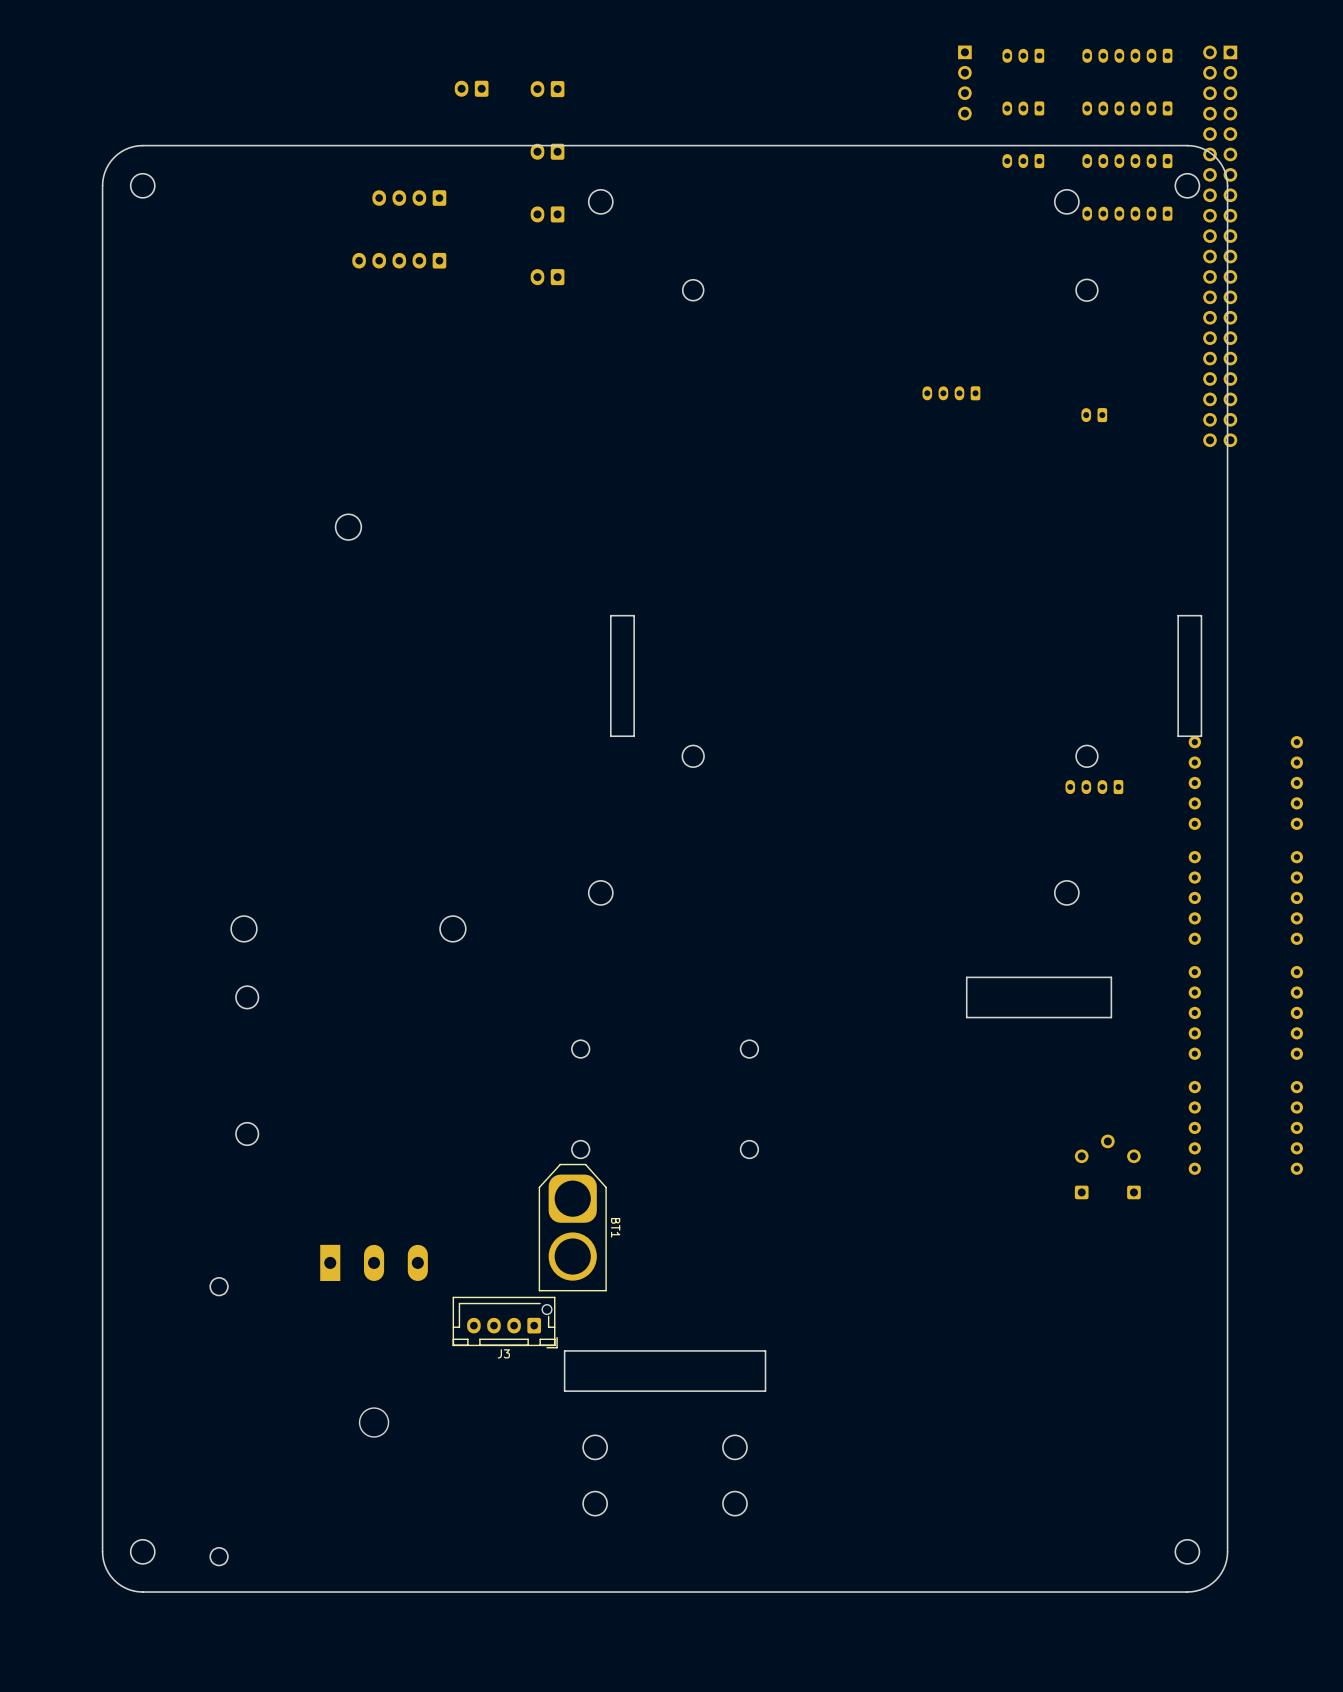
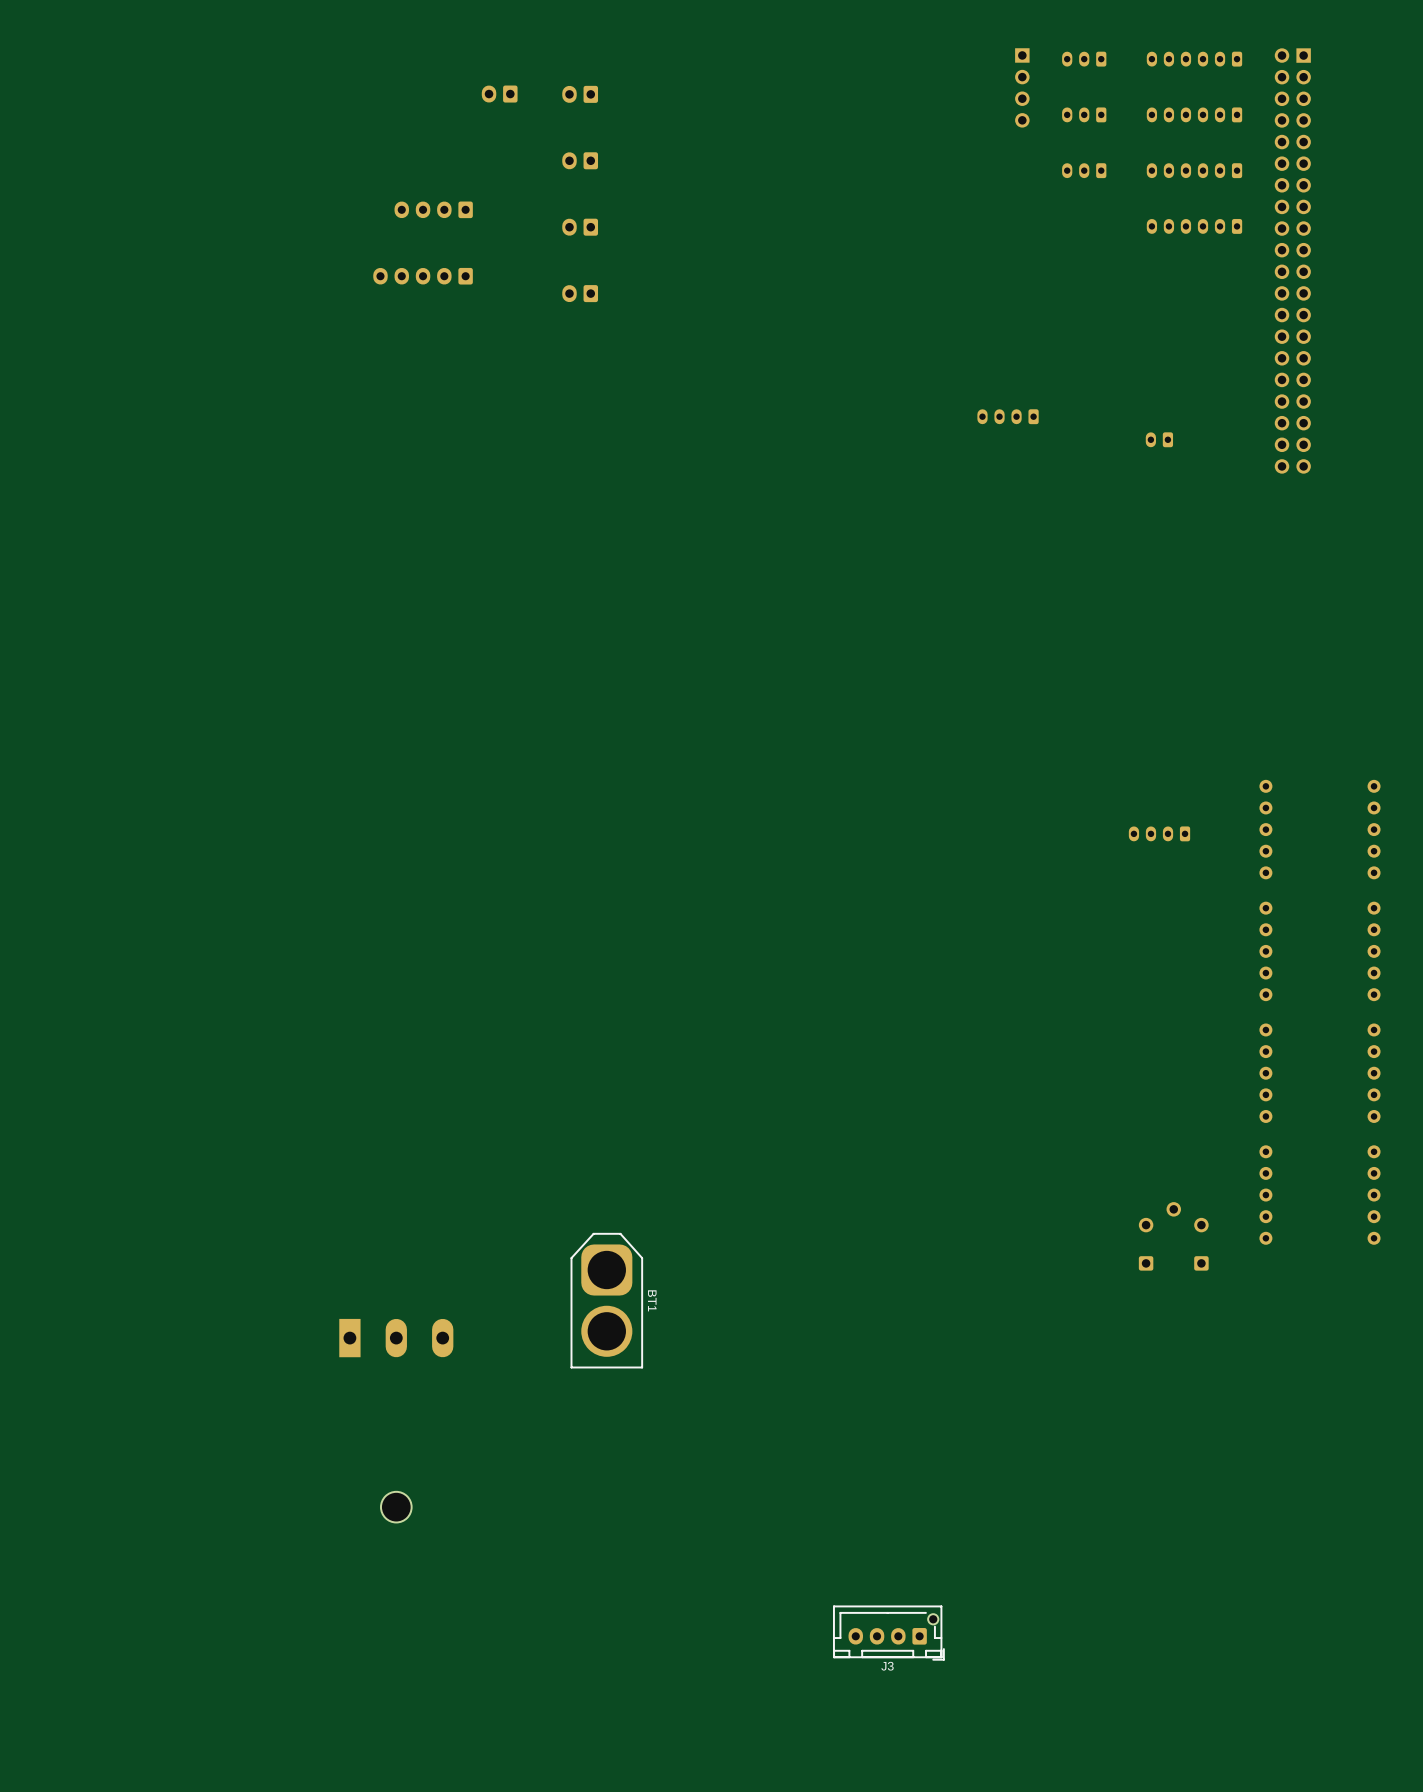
board edge: (1187, 145) (142, 145) (125, 149) (111, 160) (104, 172) (102, 185) (102, 1551) (106, 1569) (117, 1583) (129, 1589) (142, 1592) (1187, 1592) (1204, 1588) (1218, 1576) (1225, 1565) (1227, 1551) (1227, 185) (1223, 168) (1215, 157) (1204, 149) (1187, 145) -> none
round board edge: [129, 172, 156, 199] -> none
round board edge: [1174, 172, 1201, 199] -> none
round board edge: [587, 188, 614, 215] -> none
round board edge: [1053, 188, 1080, 215] -> none
round board edge: [681, 278, 705, 302] -> none
round board edge: [1075, 278, 1099, 302] -> none
round board edge: [334, 513, 363, 541] -> none
board edge: (634, 615) (610, 615) (610, 736) (634, 736) (634, 615) -> none
board edge: (1201, 615) (1201, 736) (1178, 736) (1178, 615) (1201, 615) -> none
round board edge: [681, 744, 705, 768] -> none
round board edge: [1075, 744, 1099, 768] -> none
round board edge: [587, 880, 614, 906] -> none
round board edge: [1053, 880, 1080, 906] -> none
round board edge: [230, 915, 258, 943] -> none
round board edge: [439, 915, 467, 943] -> none
board edge: (1111, 977) (1111, 1017) (966, 1017) (966, 977) (1111, 977) -> none
round board edge: [235, 985, 260, 1010] -> none
round board edge: [571, 1039, 591, 1059] -> none
round board edge: [739, 1039, 760, 1059] -> none
round board edge: [235, 1121, 260, 1147] -> none
round board edge: [571, 1139, 591, 1160] -> none
round board edge: [739, 1139, 760, 1160] -> none
round board edge: [209, 1277, 229, 1297] -> none
J3 position: (505, 1322) -> (888, 1633)
board edge: (765, 1350) (564, 1350) (564, 1391) (765, 1391) (765, 1350) -> none
round board edge: [582, 1434, 609, 1461] -> none
round board edge: [722, 1434, 748, 1461] -> none
round board edge: [582, 1490, 608, 1517] -> none
round board edge: [722, 1490, 748, 1517] -> none
round board edge: [129, 1538, 156, 1565] -> none
round board edge: [1174, 1538, 1201, 1565] -> none
round board edge: [209, 1547, 229, 1567] -> none

